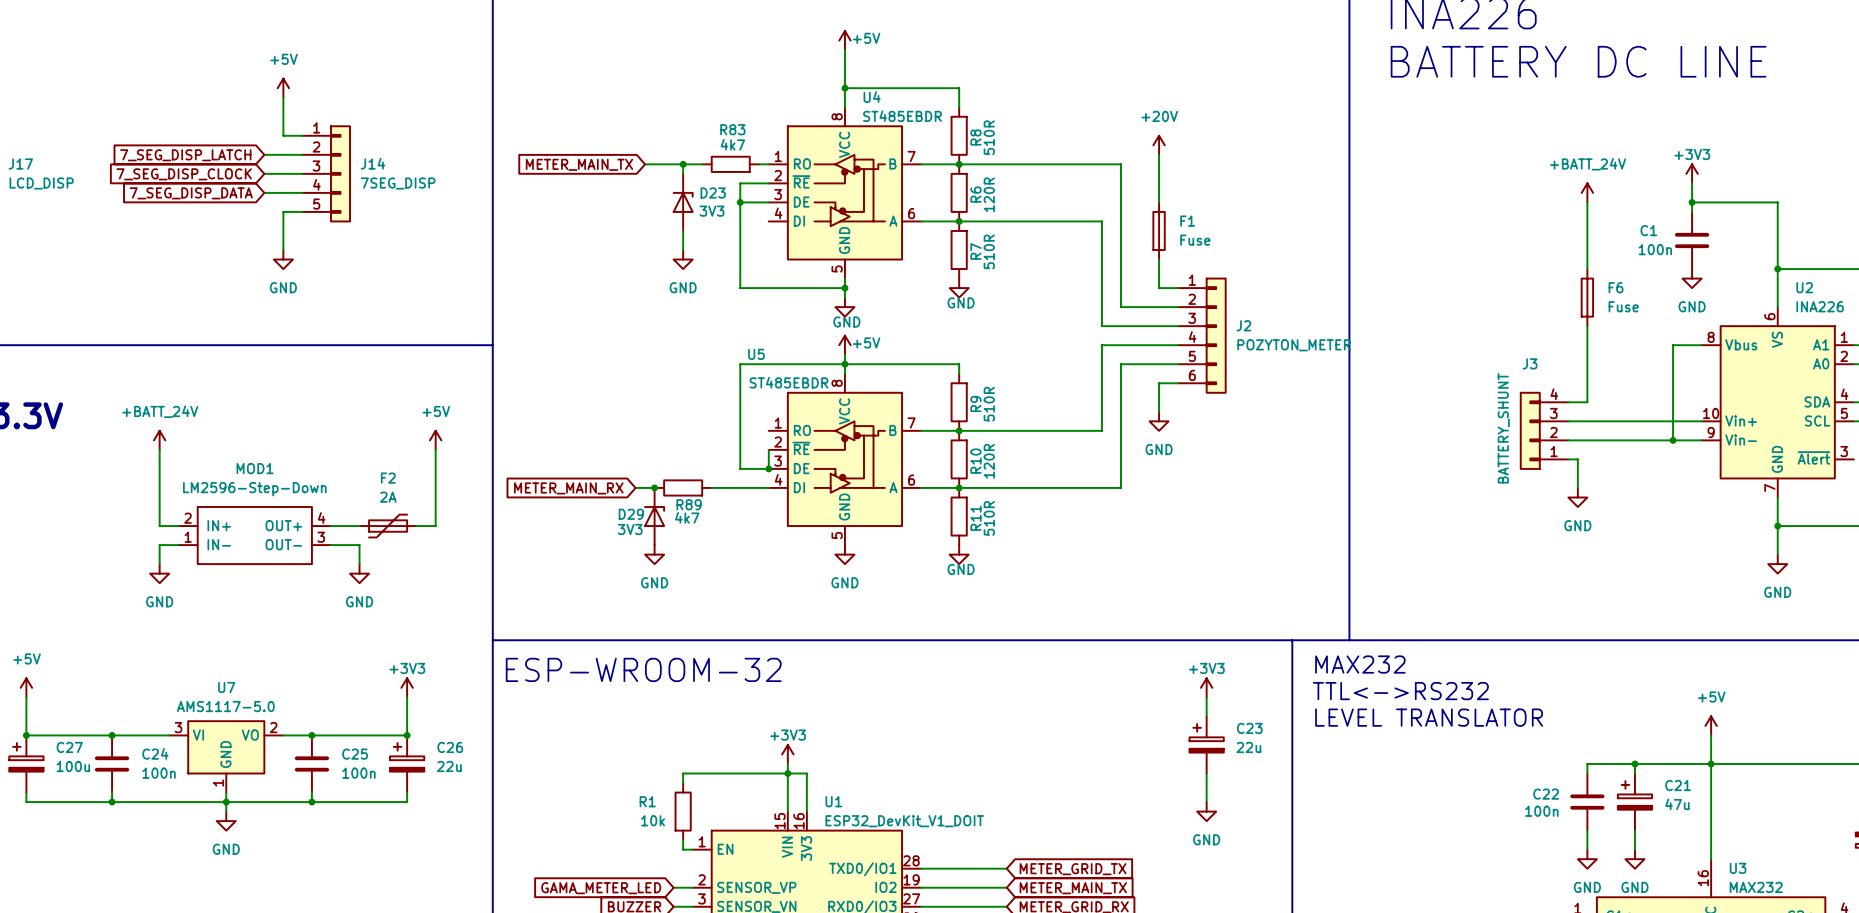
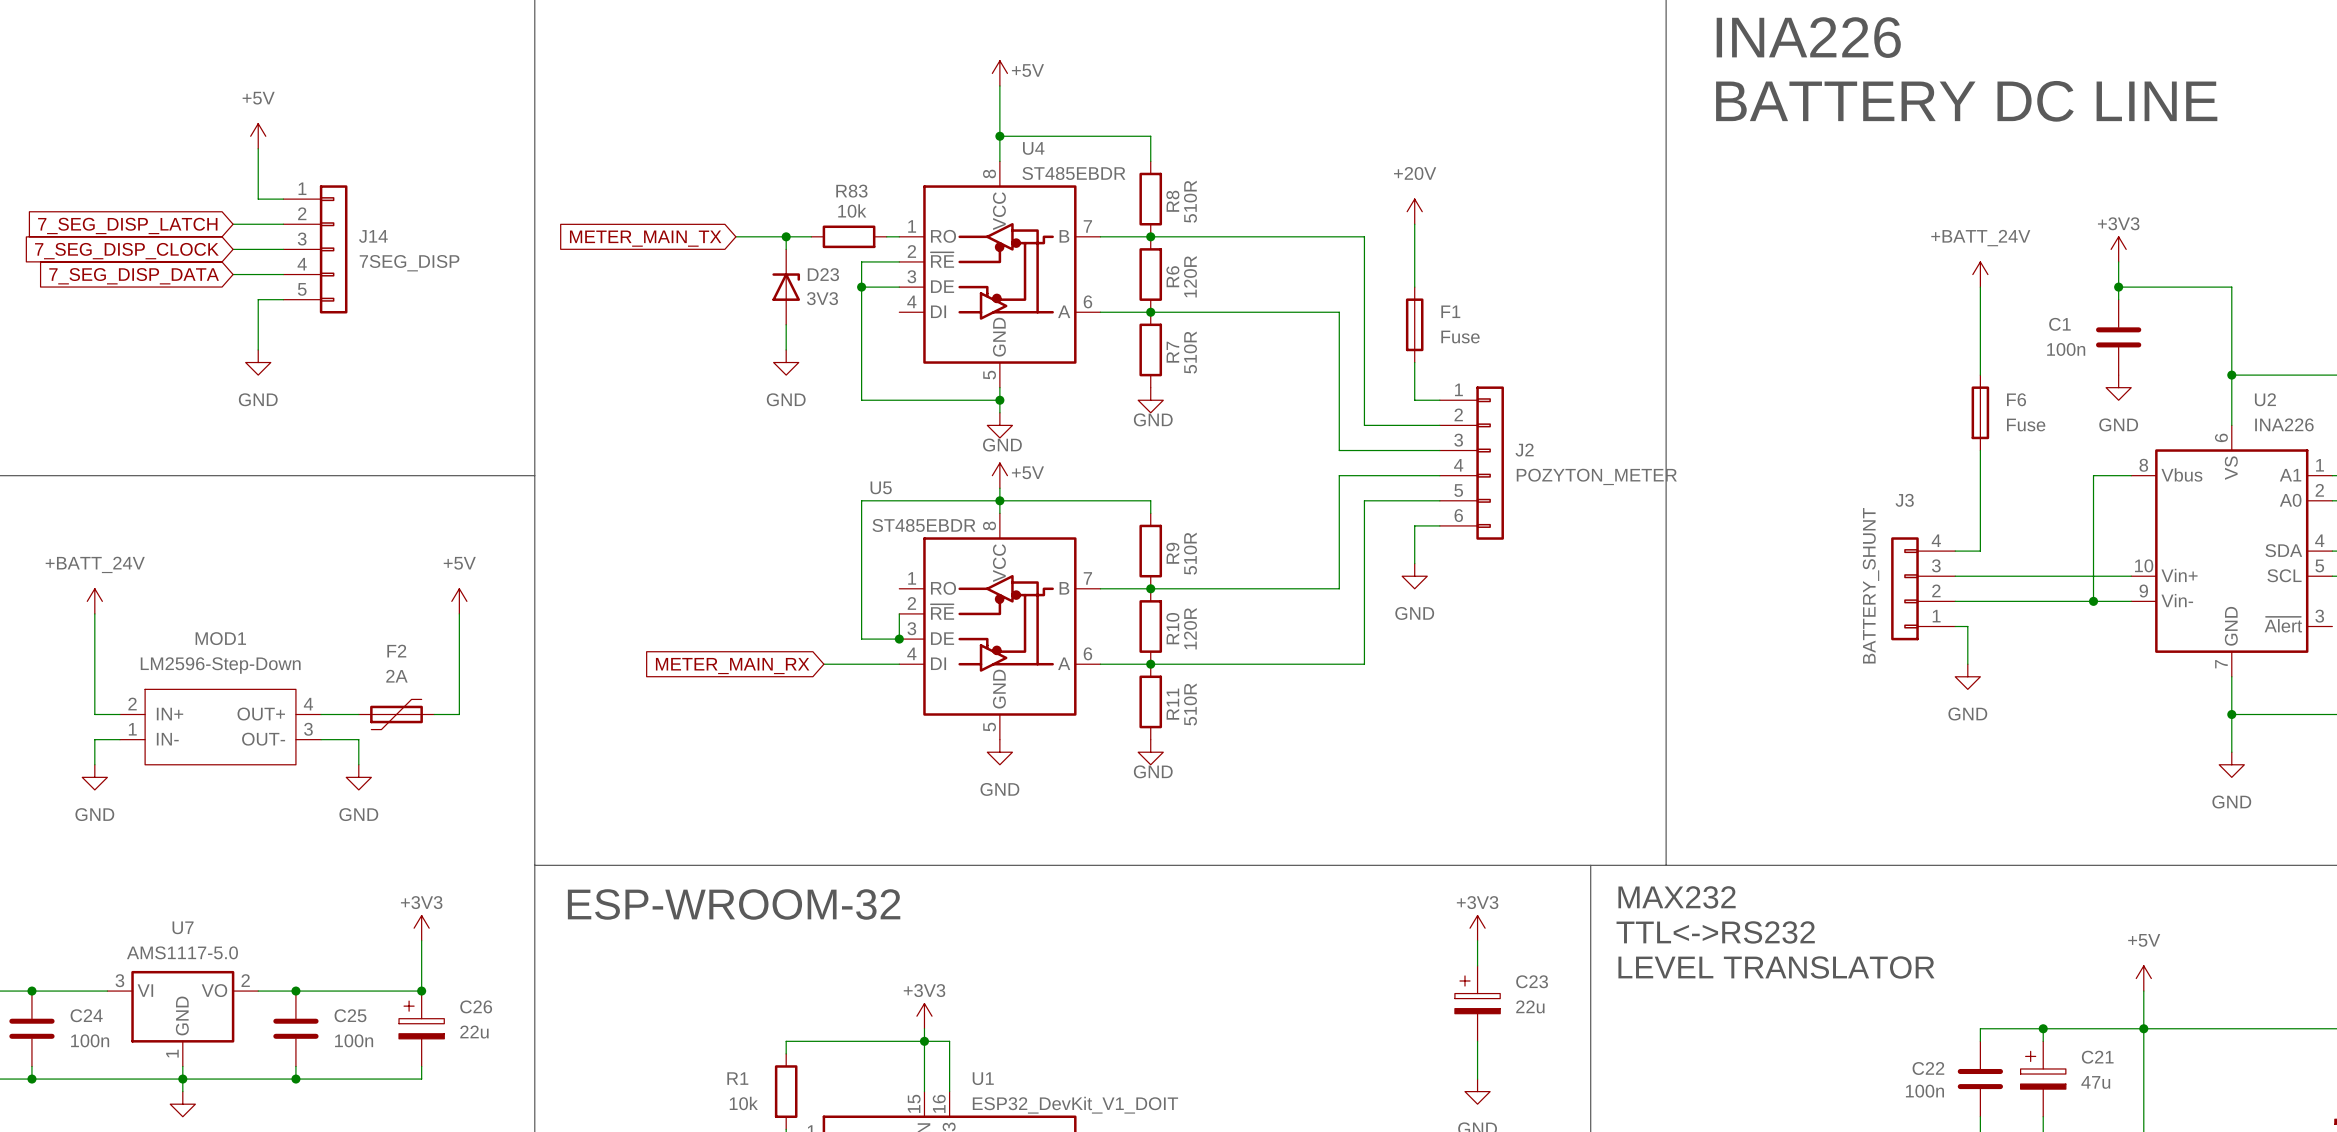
R83 value: 4k7 (732, 144) -> 10k (852, 210)
wire: (635, 487) (654, 487) -> none
junction: (654, 487) -> none
R89: 4k7 (683, 487) -> none
global label position: METER_MAIN_RX (568, 488) -> METER_MAIN_RX (732, 666)
D29: 3V3 (654, 516) -> none
power symbol: GND (654, 554) -> none

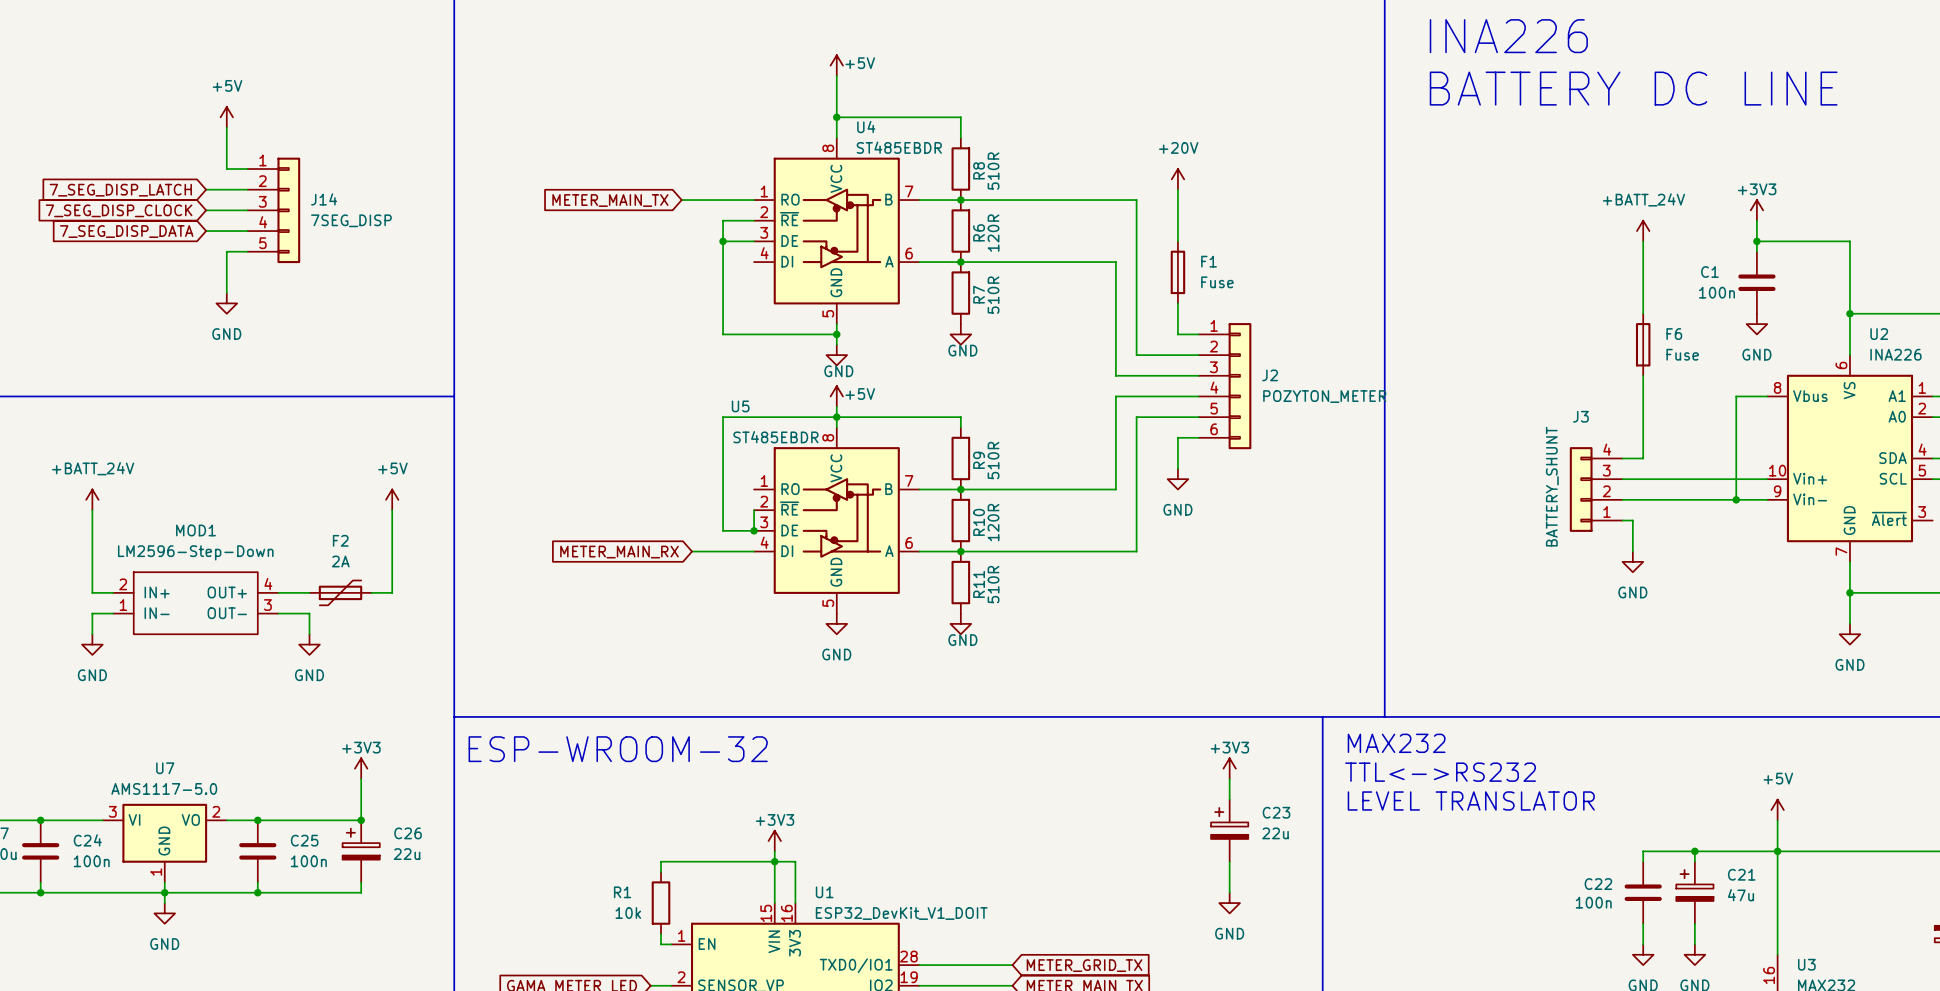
wire: (735, 236) (811, 236) -> (743, 200) (681, 200)
wire: (786, 236) (786, 249) -> none
junction: (786, 236) -> none
R83: 10k (849, 236) -> none
global label position: METER_MAIN_TX (645, 238) -> METER_MAIN_TX (610, 200)
D23: 3V3 (786, 287) -> none
wire: (786, 324) (786, 349) -> none
power symbol: GND (786, 362) -> none

